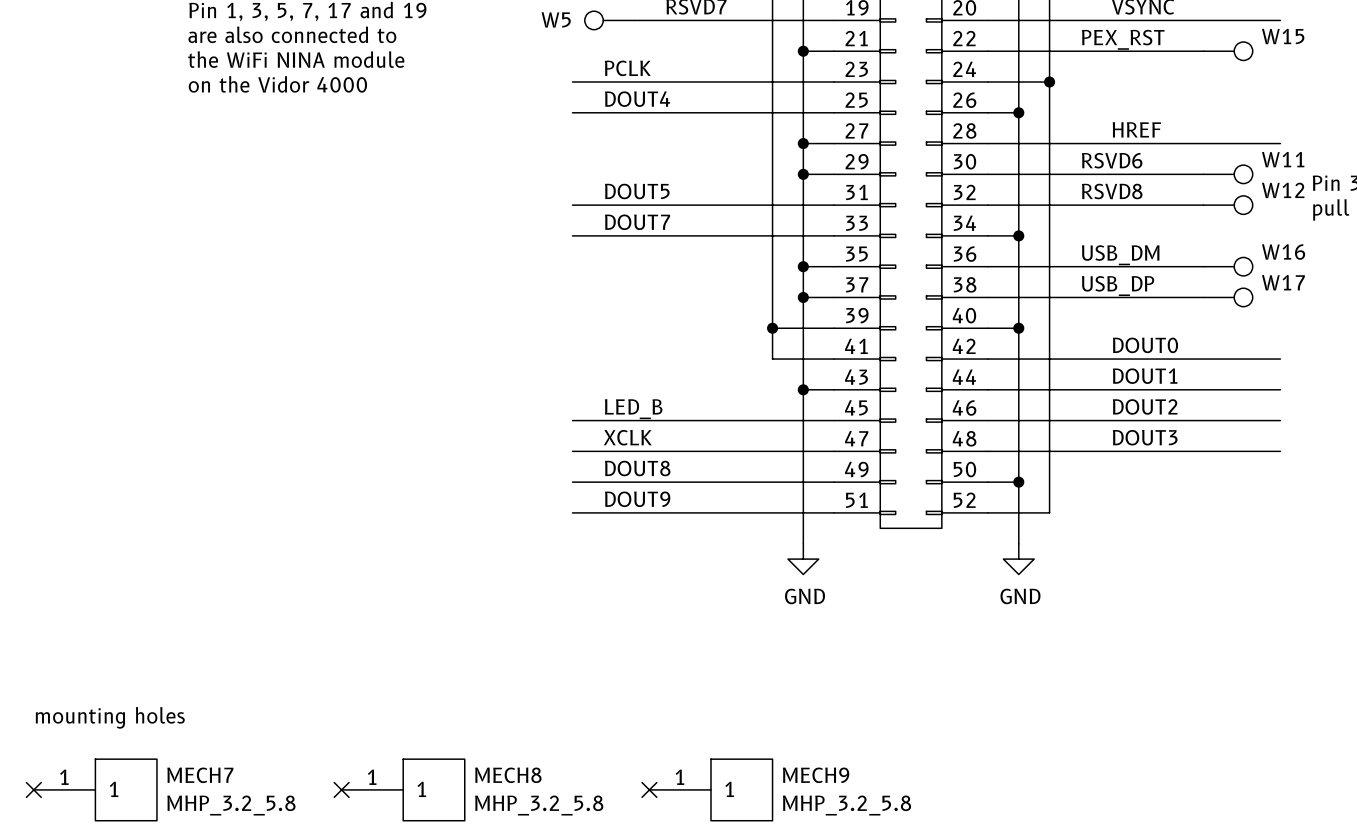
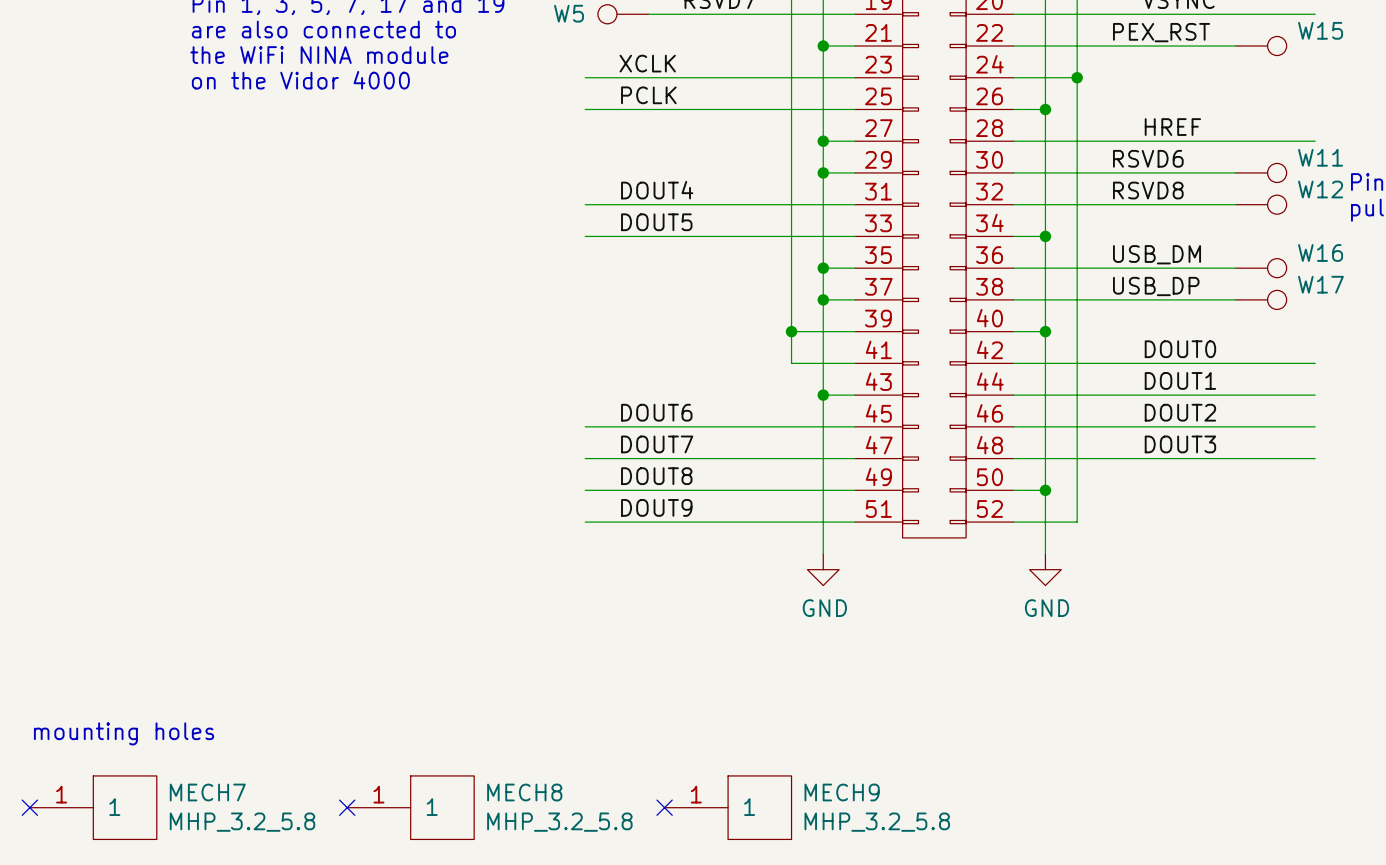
label: PCLK (627, 68) -> XCLK (647, 63)
label: DOUT4 (637, 99) -> PCLK (648, 95)
label: DOUT5 (637, 191) -> DOUT4 (657, 190)
label: DOUT7 (637, 222) -> DOUT5 (656, 222)
label: LED_B (633, 409) -> DOUT6 (656, 412)
label: XCLK (627, 437) -> DOUT7 (657, 444)

